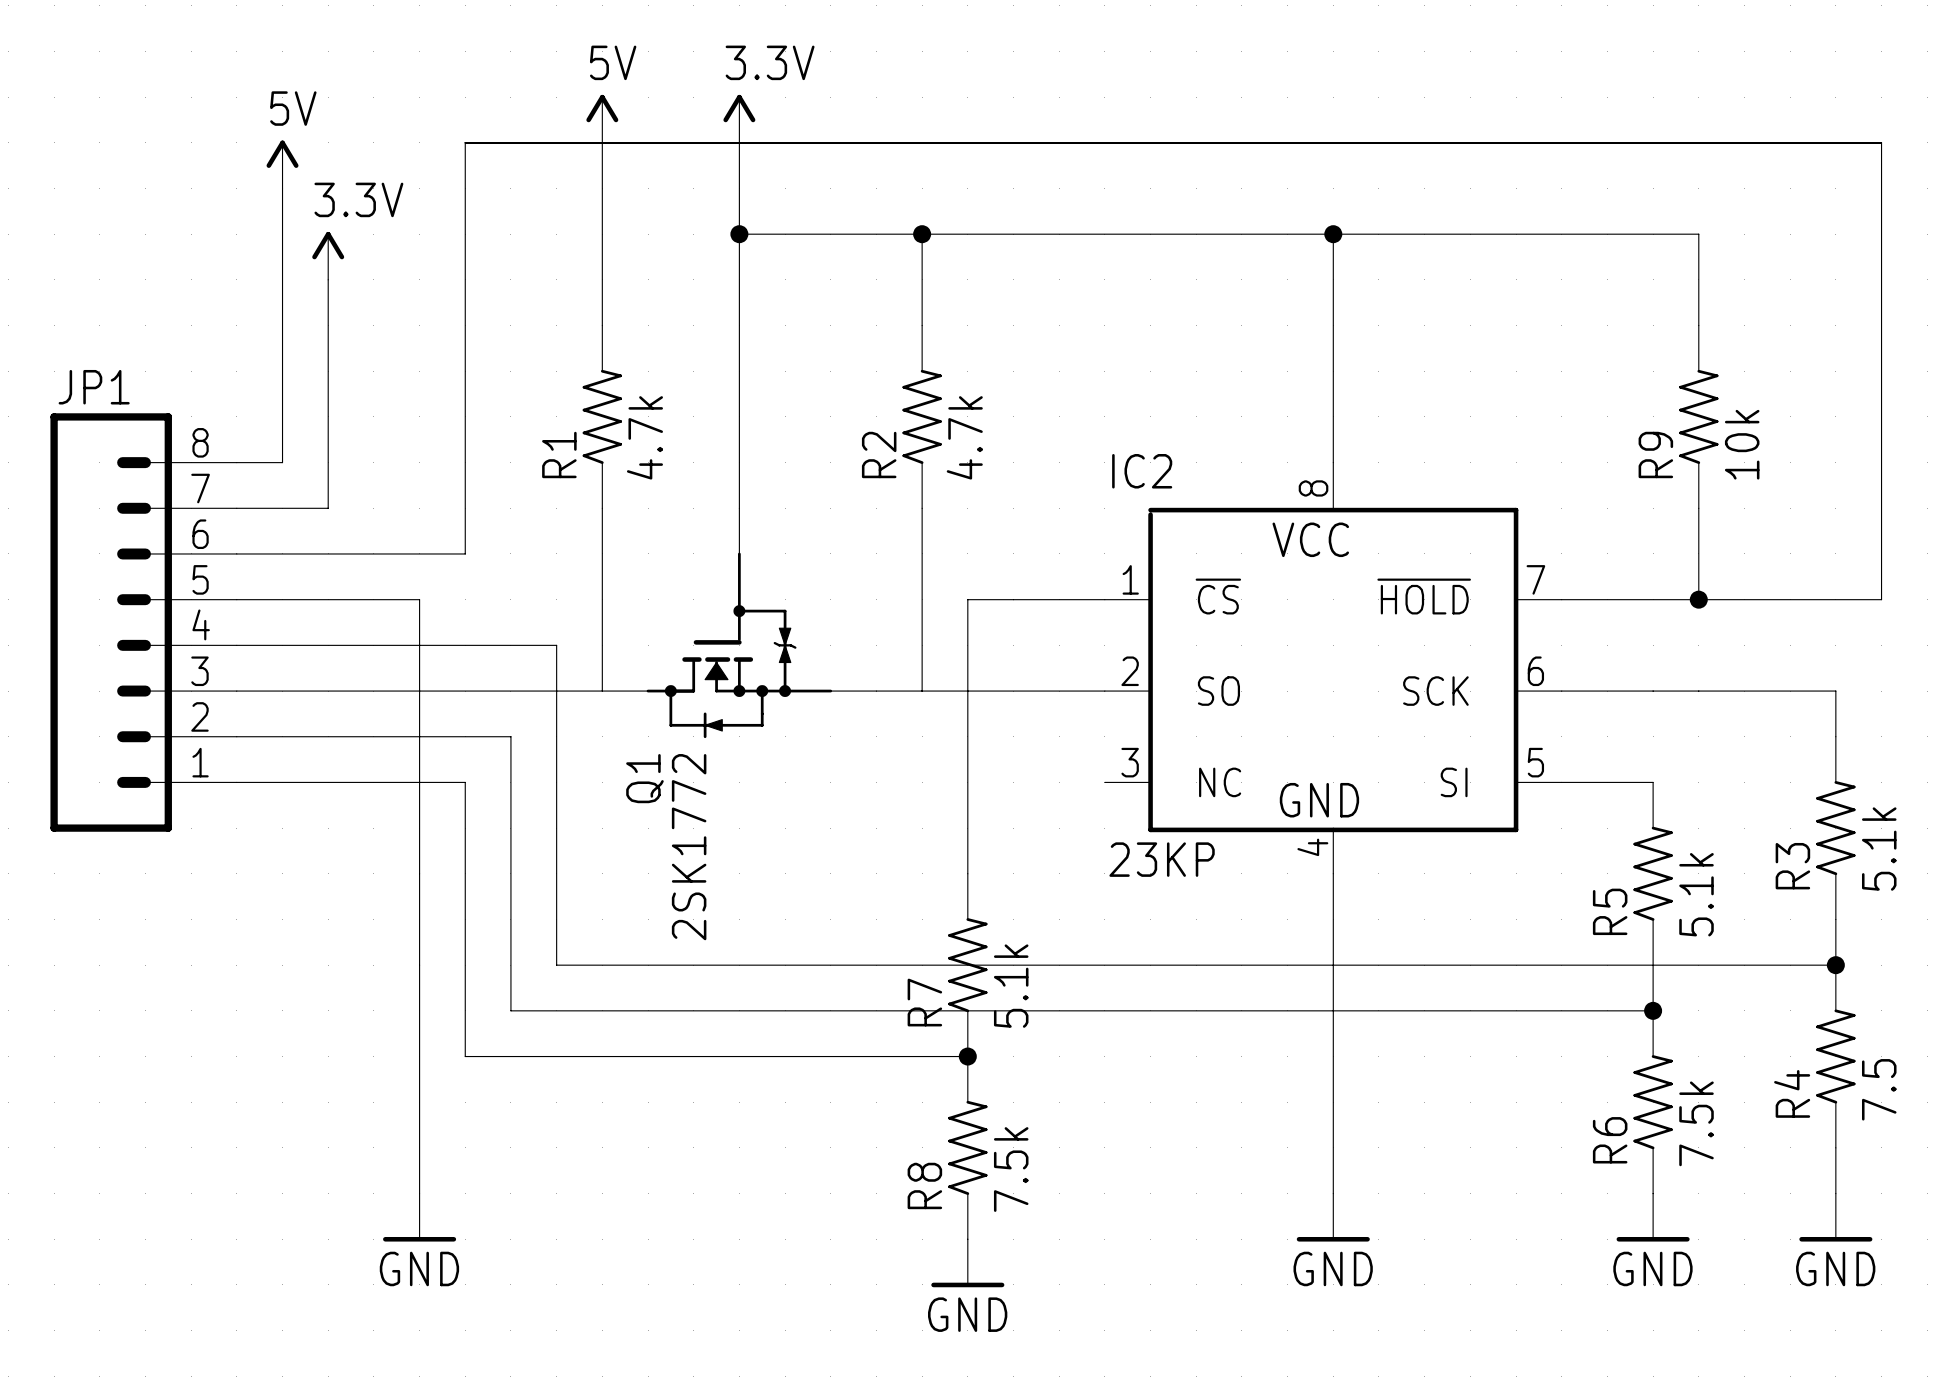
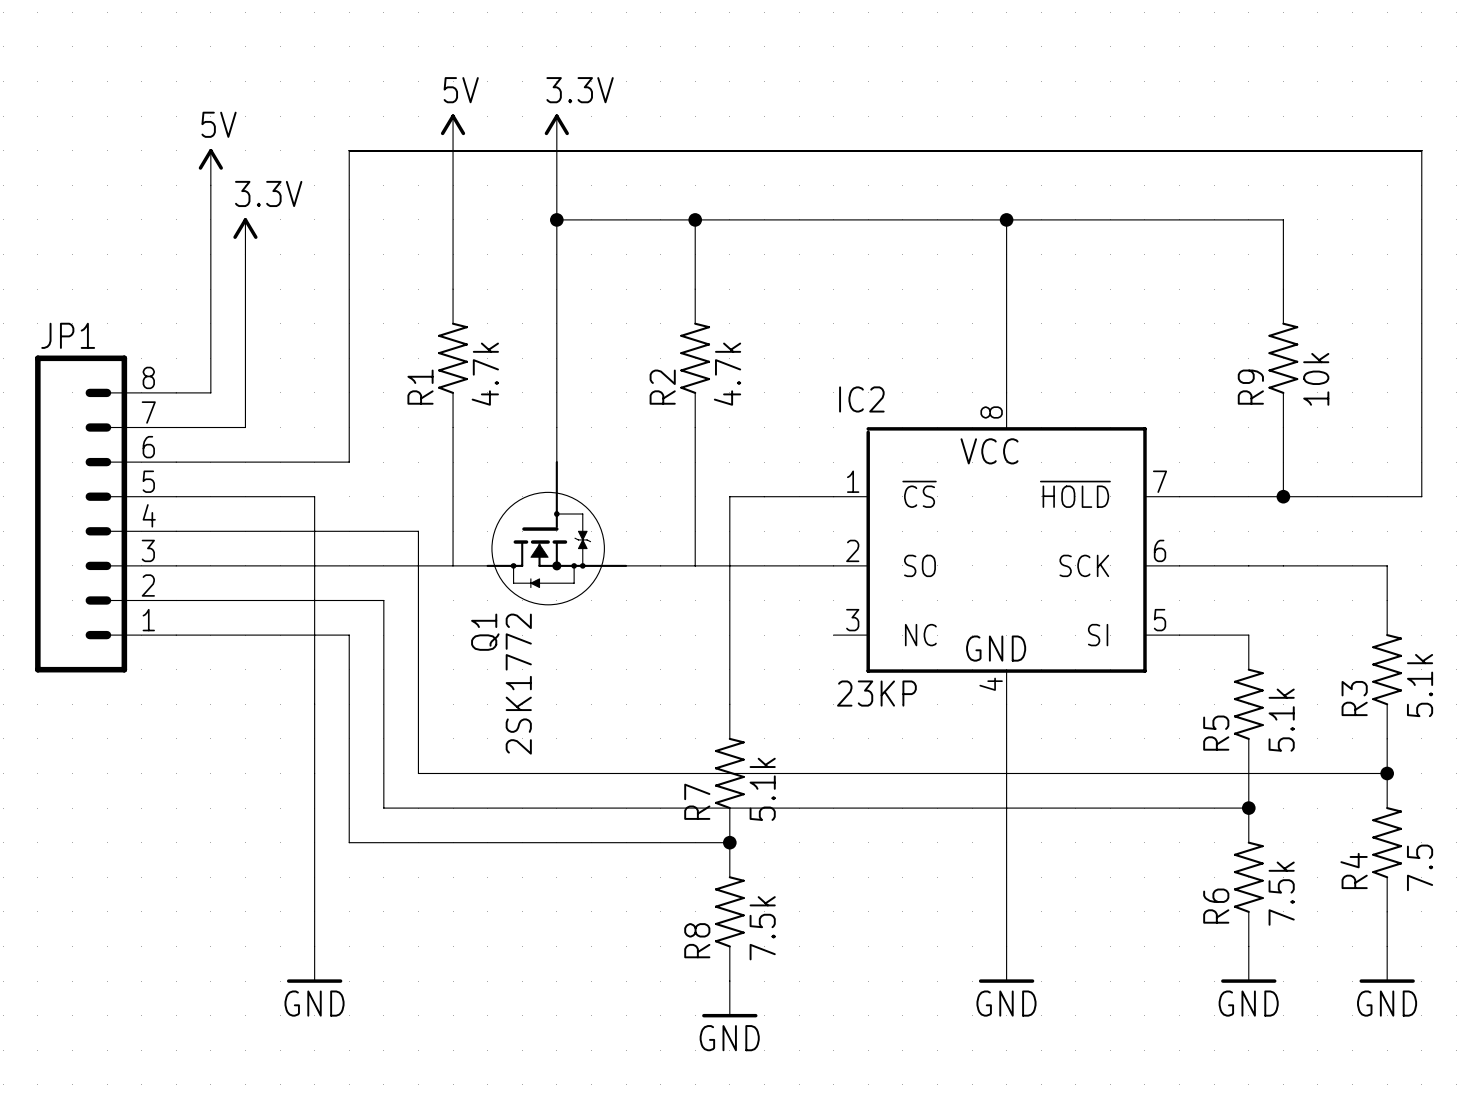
Q1 symbol: [602, 508, 877, 739] -> [453, 427, 661, 606]

